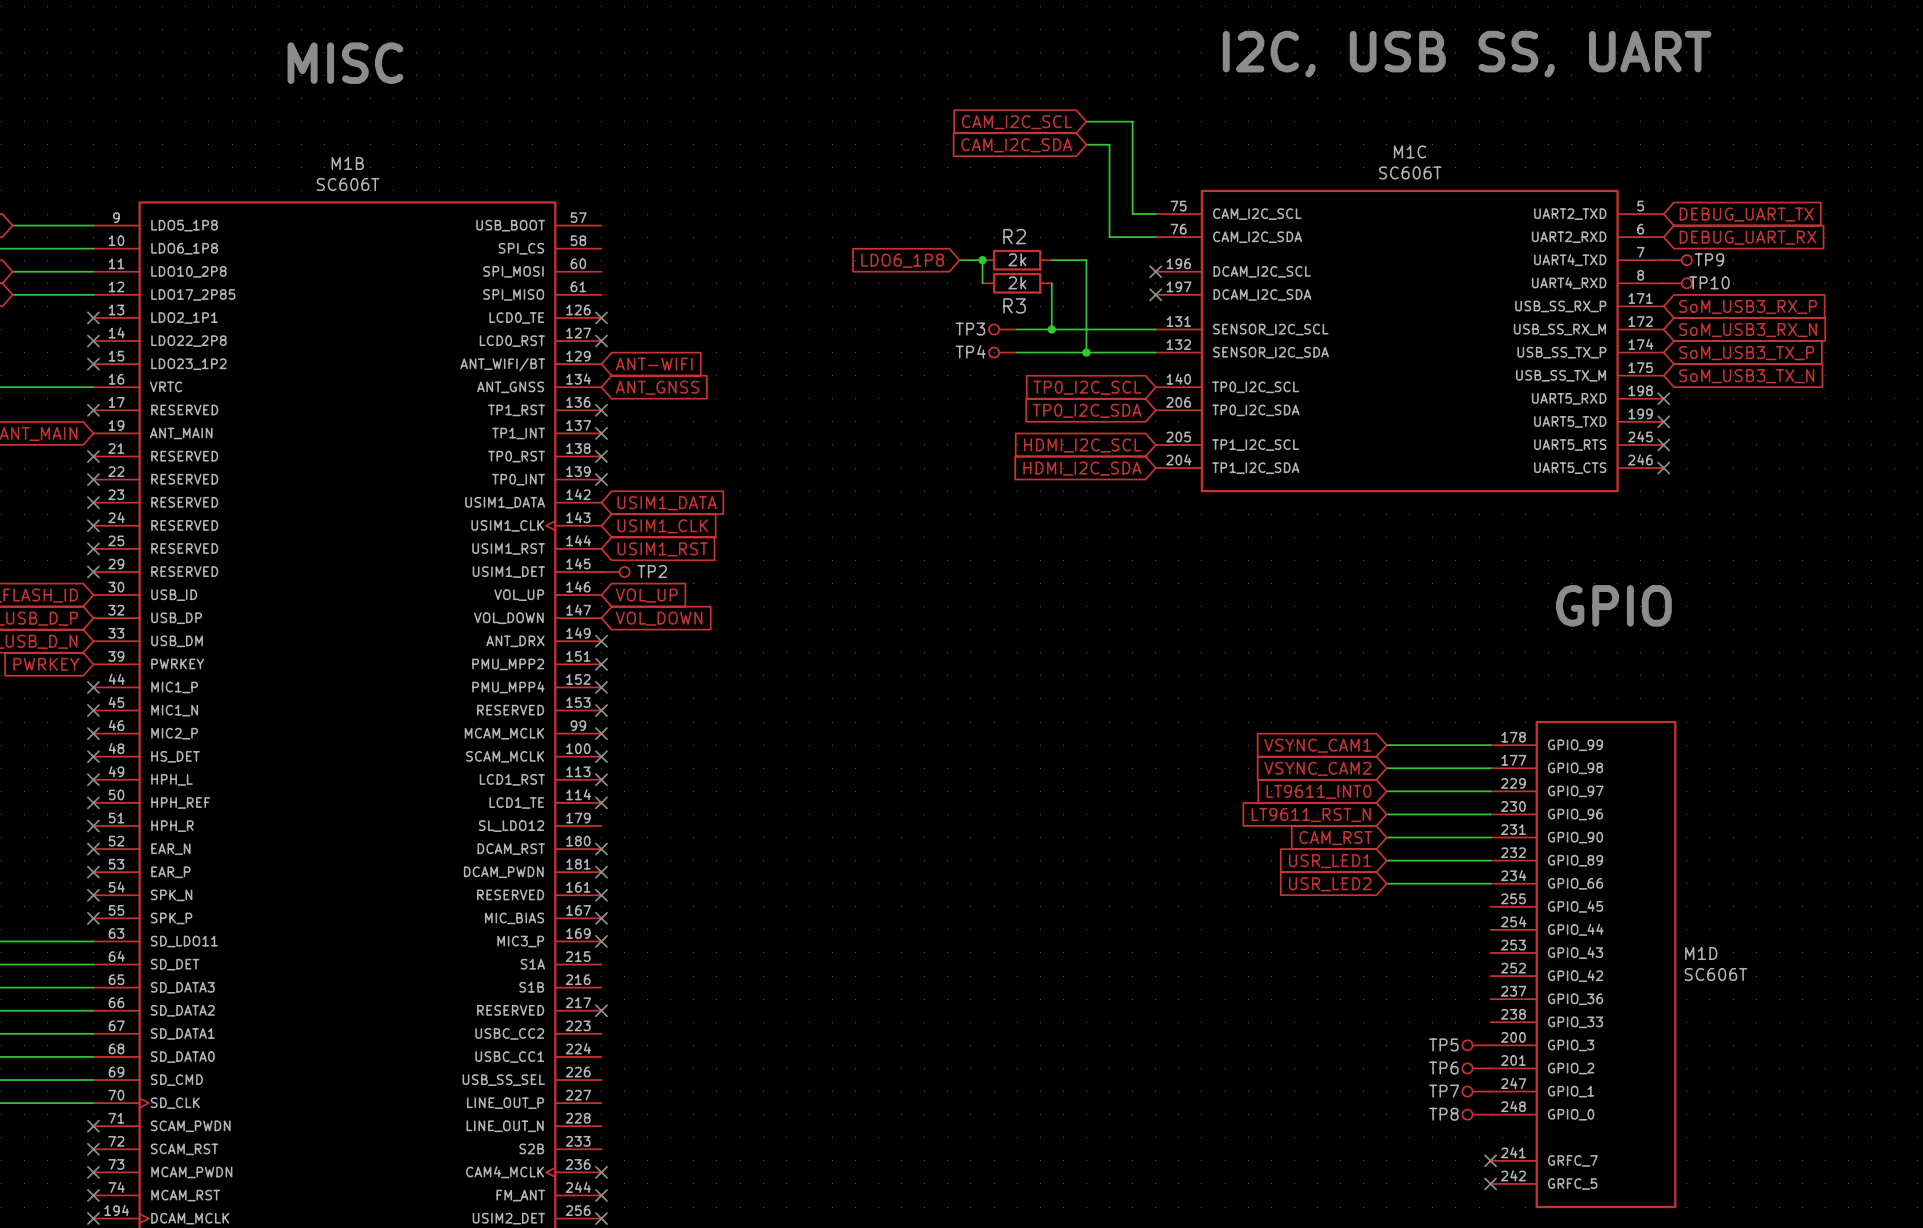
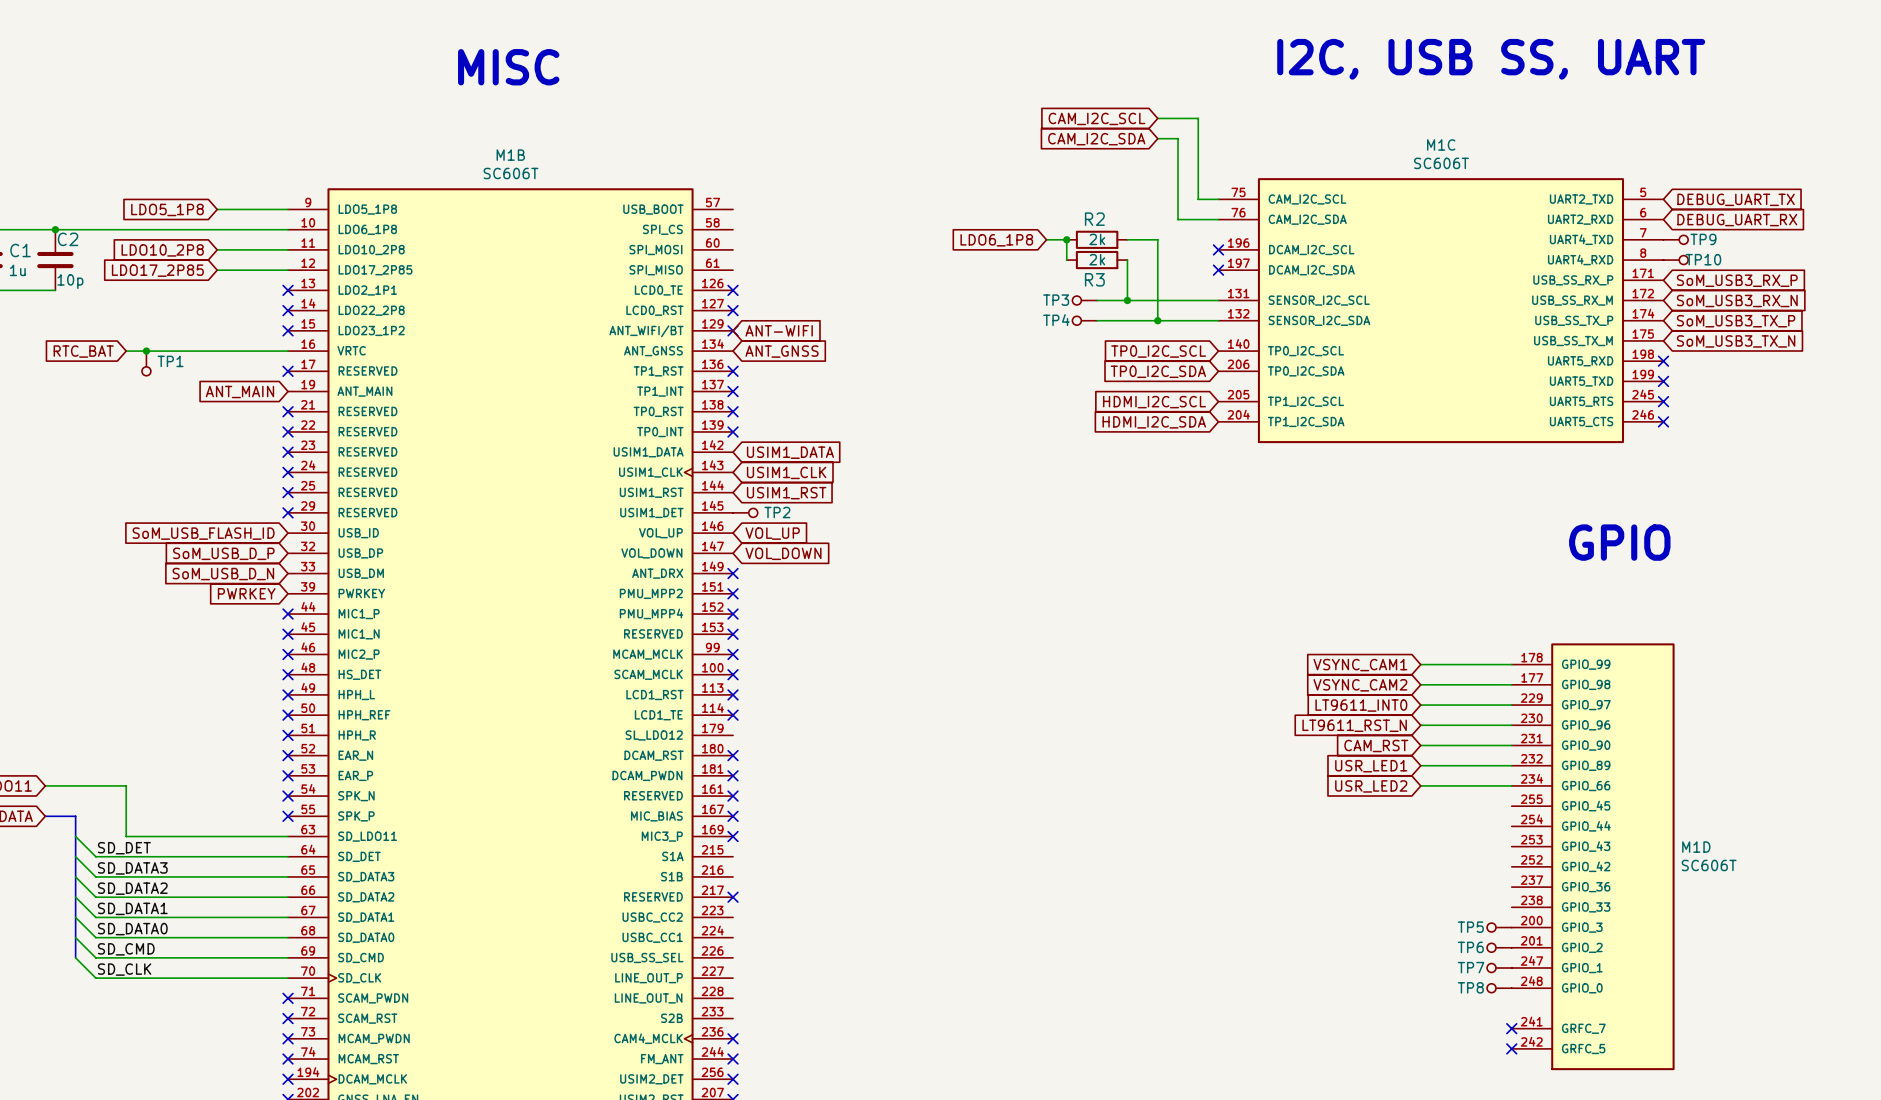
no-connect mark: none -> (733, 330)

